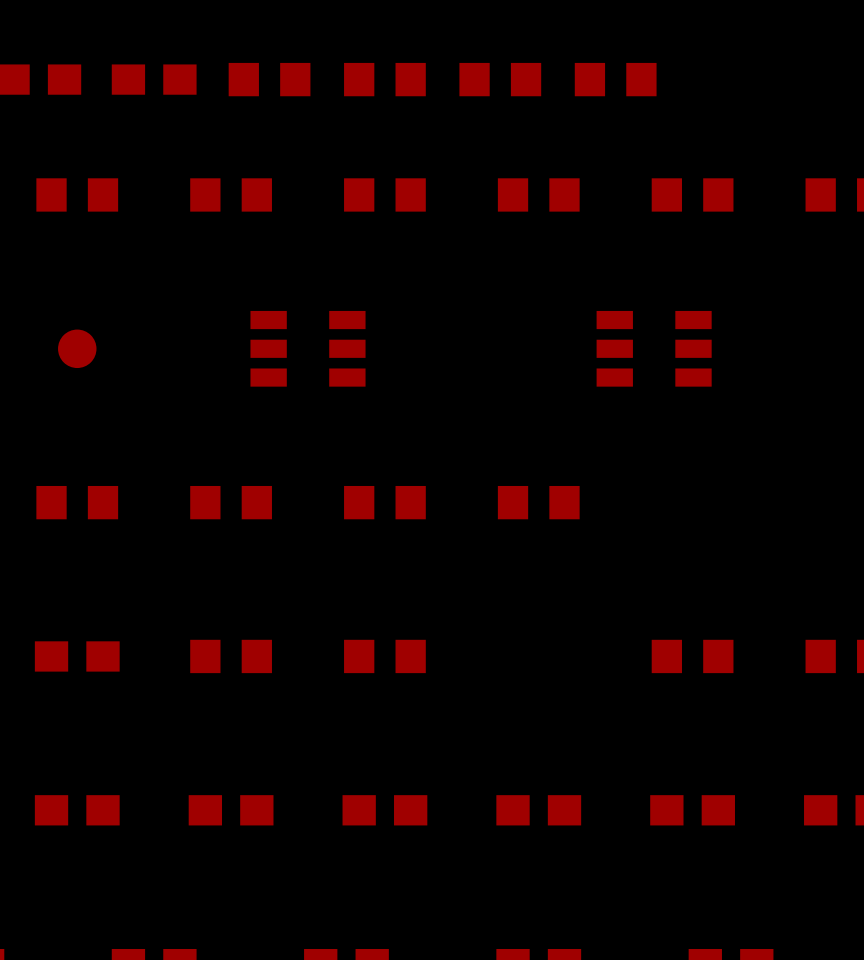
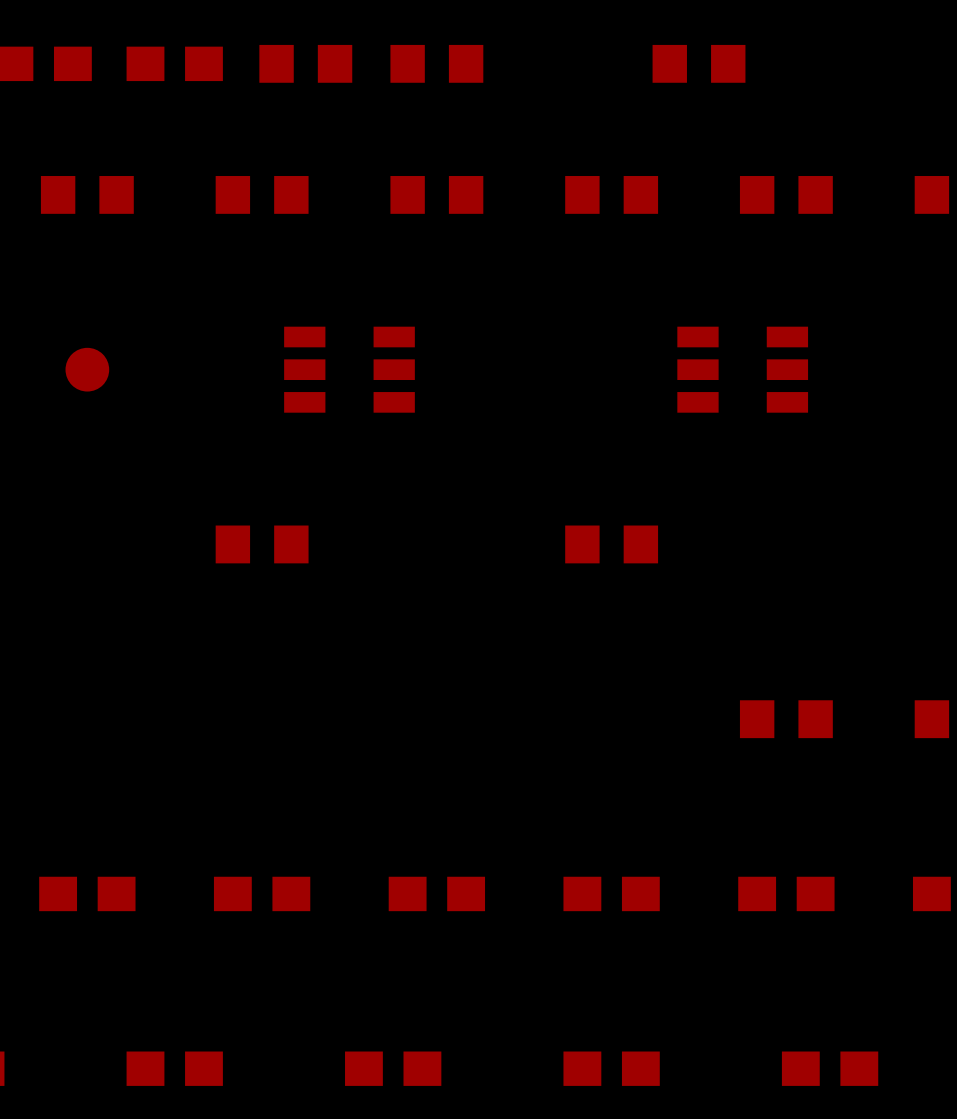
part: (500, 79) -> none
part: (77, 502) -> none
part: (384, 502) -> none
part: (77, 656) -> none
part: (231, 656) -> none
part: (384, 656) -> none

